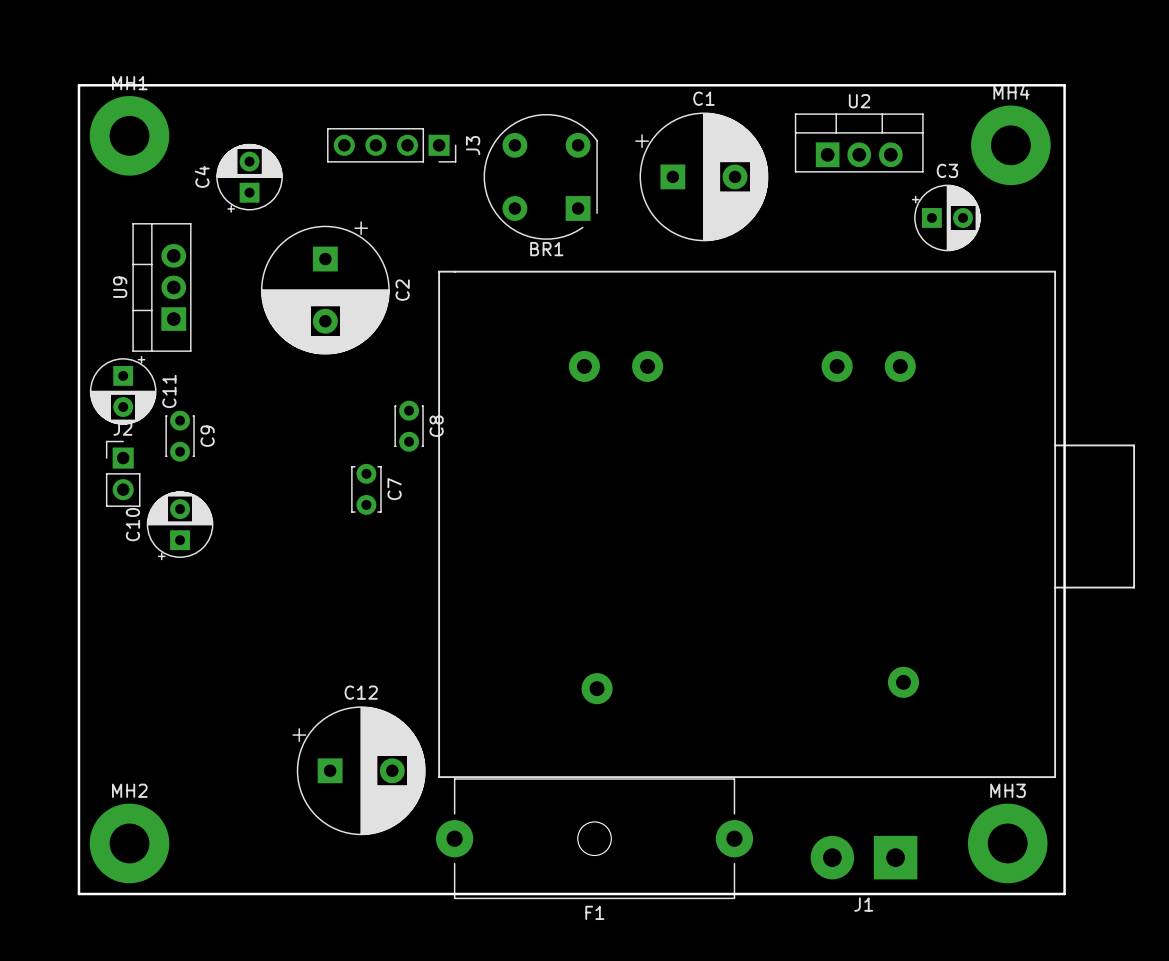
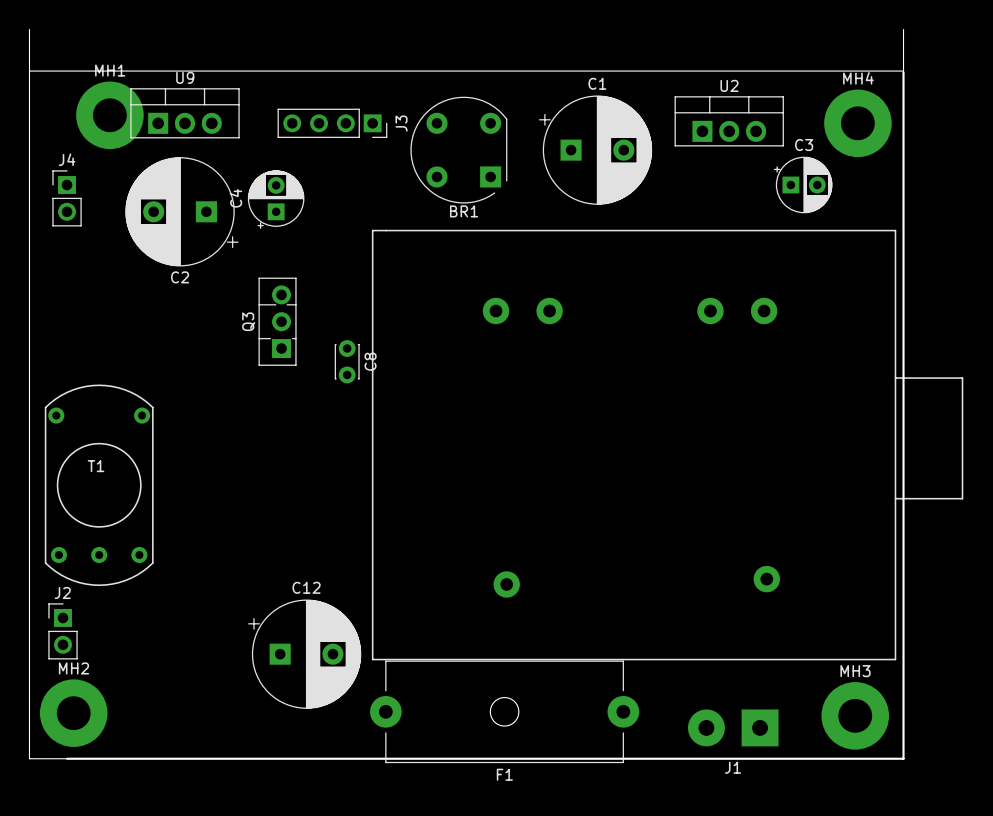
board edge: none -> (903, 29) (903, 72)
board edge: none -> (29, 71) (903, 71)
board edge: (1064, 85) (78, 85) (78, 893) -> (29, 29) (29, 758) (67, 758)
C4 position: (249, 178) -> (276, 199)
J4: none -> (67, 198)
U9 rotation: 0° (161, 287) -> 90° clockwise (184, 113)
U9 position: (161, 287) -> (184, 113)
C2 rotation: 0° (325, 287) -> 90° clockwise (181, 211)
C2 position: (325, 287) -> (181, 211)
Q3: none -> (277, 321)
C11: (123, 390) -> none
C9: (180, 436) -> none
J2 position: (123, 473) -> (63, 631)
C7: (366, 489) -> none
C10: (180, 525) -> none
T1: none -> (99, 485)
MH2 position: (129, 843) -> (73, 713)

